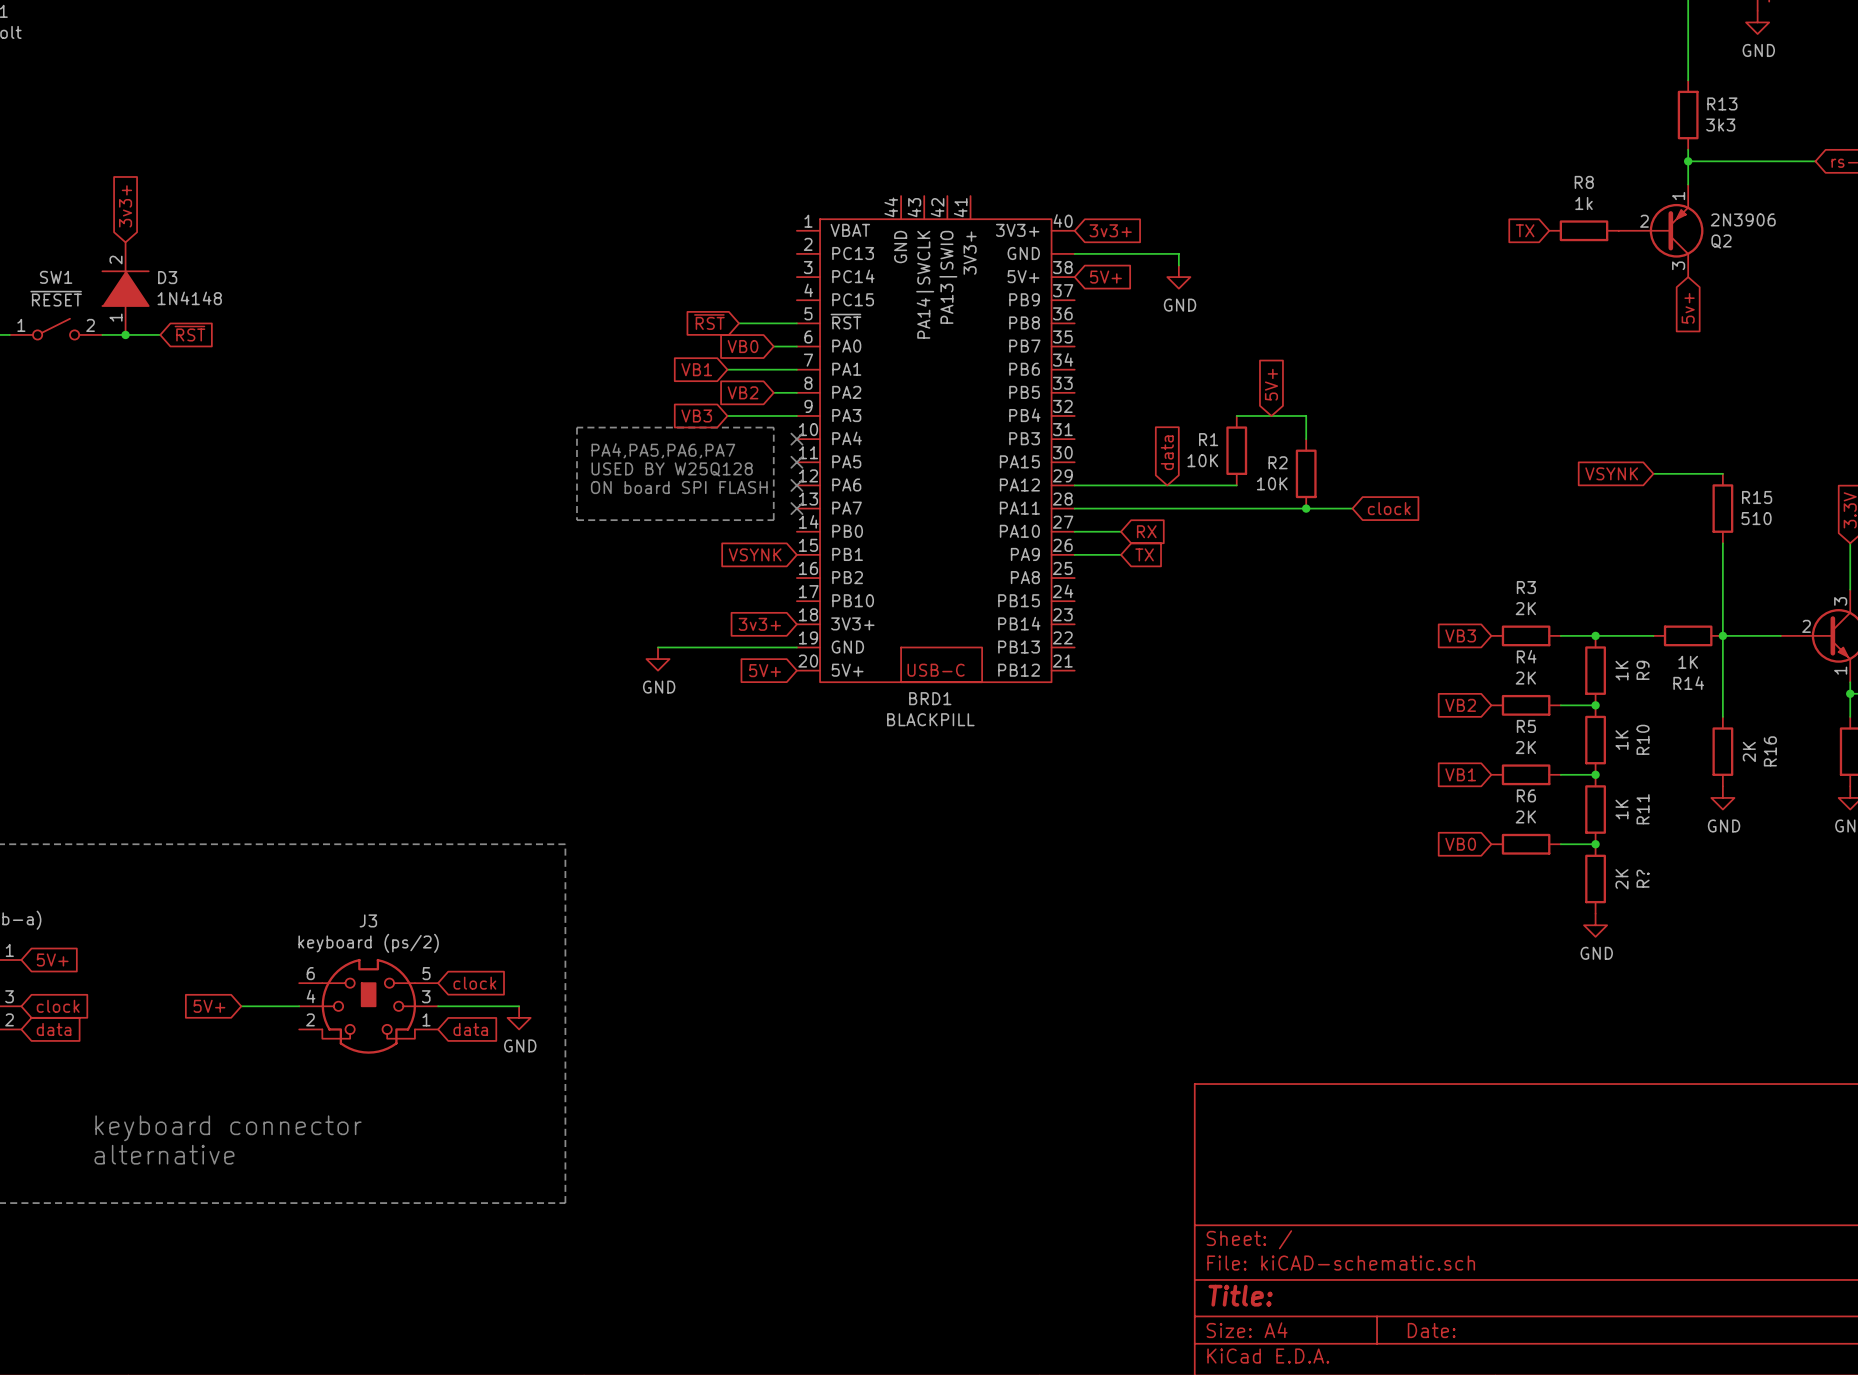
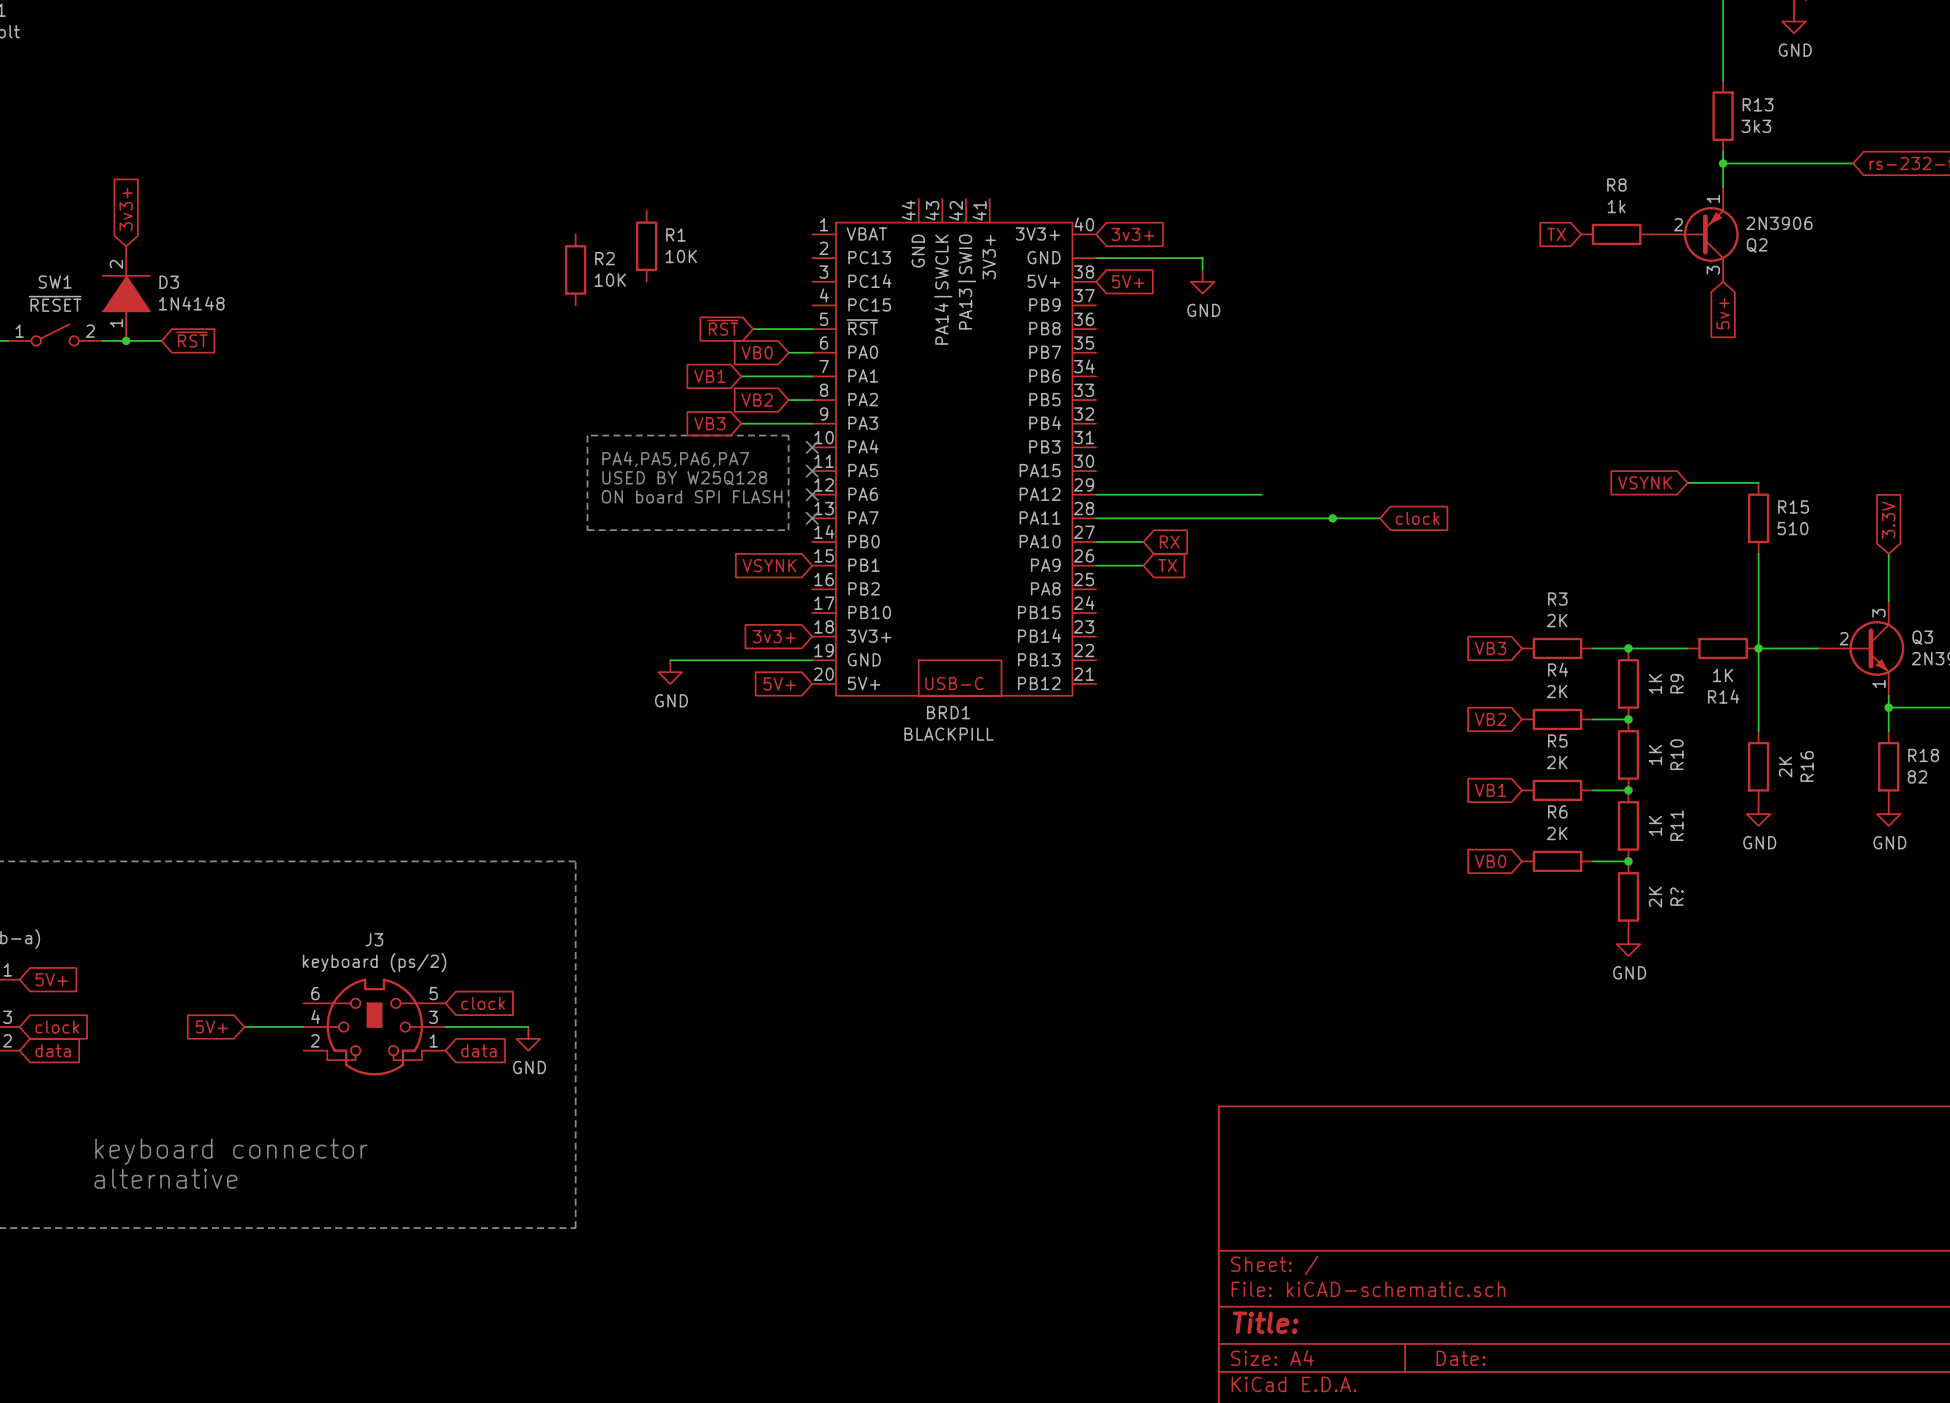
global label: 5V+ (1271, 384) -> none
wire: (1236, 415) (1306, 415) (1306, 439) -> none
R1 name position: R1 (1208, 439) -> R1 (675, 234)
R1 position: (1236, 450) -> (646, 246)
global label: data (1167, 452) -> none
R1 value position: 10K (1202, 460) -> 10K (681, 256)
R2 name position: R2 (1278, 462) -> R2 (604, 258)
R2 position: (1306, 473) -> (575, 269)
R2 value position: 10K (1272, 483) -> 10K (610, 280)

